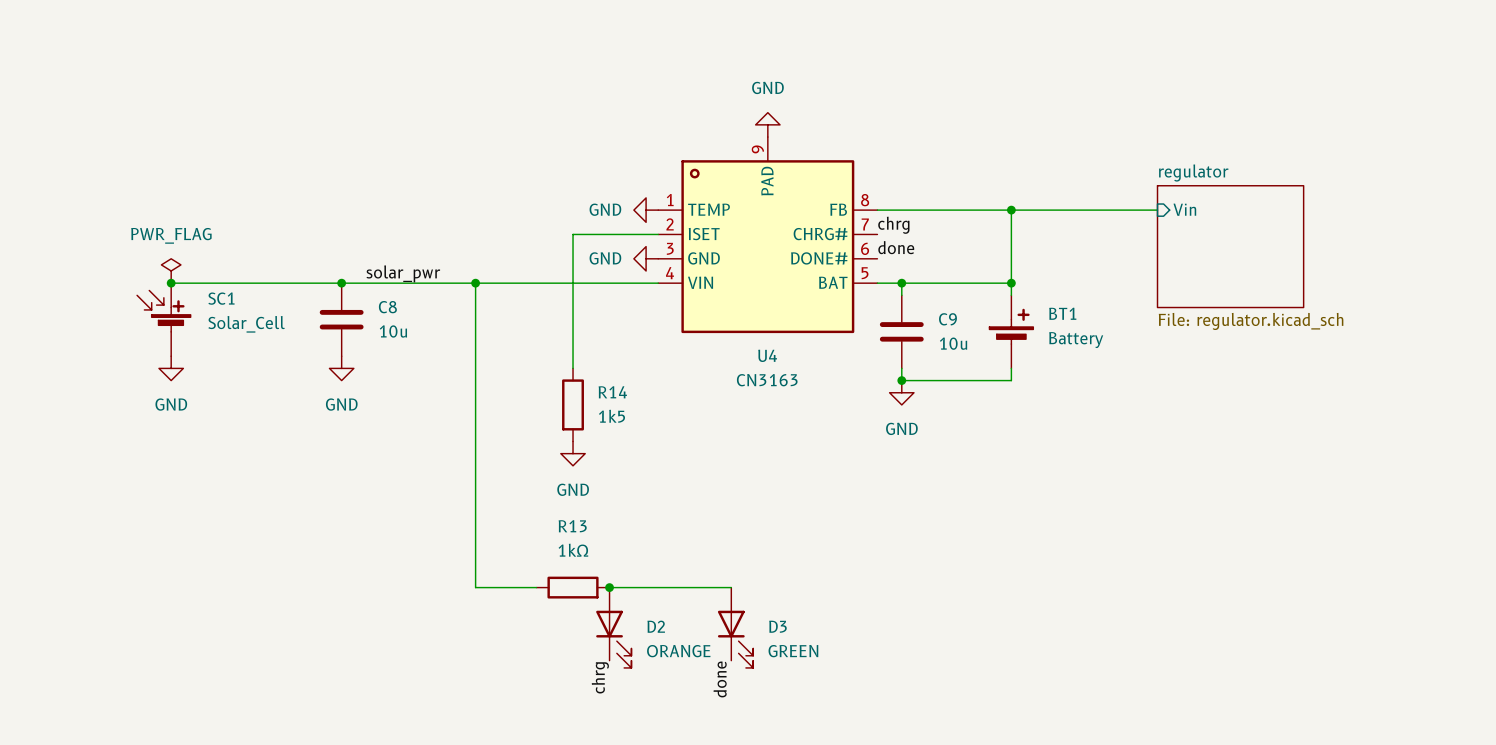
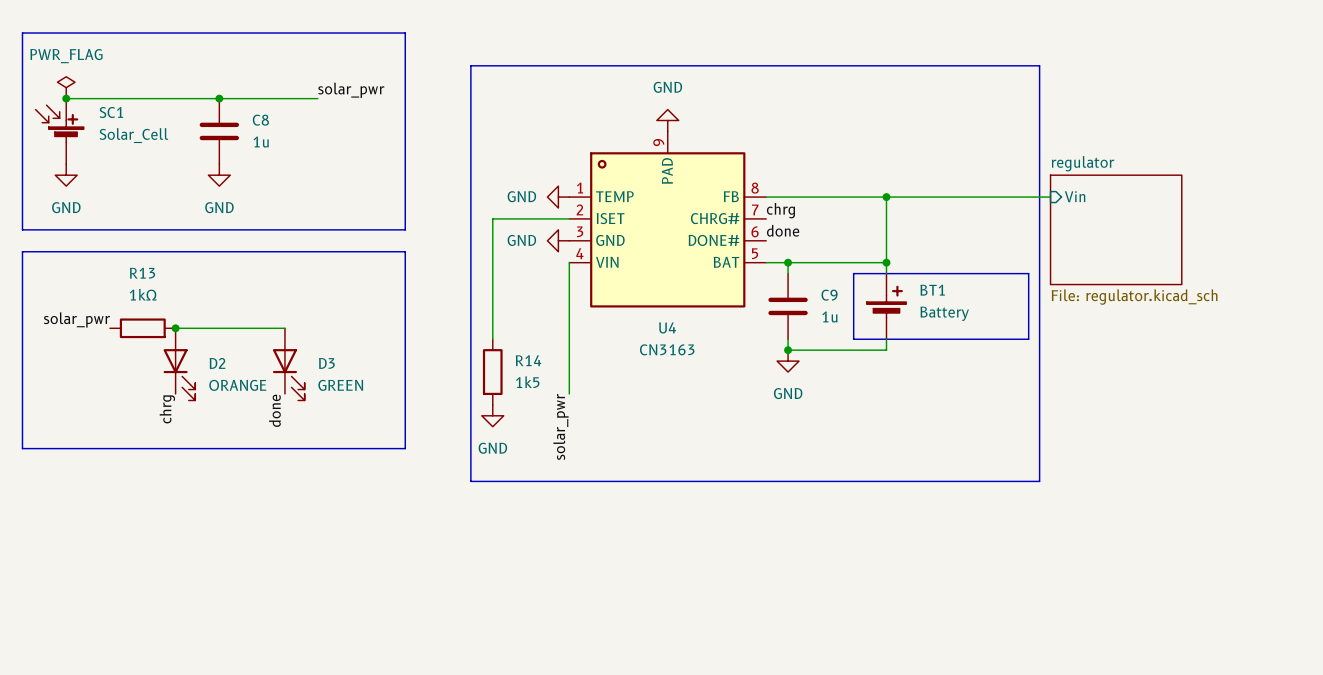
line: none -> (22, 33) (405, 33) (405, 229) (22, 229) (22, 33)
line: none -> (470, 65) (1039, 65) (1039, 481) (470, 481) (470, 65)
label: none -> solar_pwr (351, 90)
wire: none -> (66, 98) (317, 98)
junction: none -> (66, 98)
junction: none -> (219, 98)
power symbol: none -> GND (66, 175)
power symbol: none -> GND (219, 175)
sheet pin position: Vin (1184, 209) -> Vin (1075, 196)
wire: none -> (1017, 197) (1050, 197)
sheet regulator position: (1230, 246) -> (1116, 229)
line: none -> (22, 251) (22, 448) (405, 448) (405, 251) (22, 251)
power symbol position: PWR_FLAG (171, 270) -> PWR_FLAG (66, 87)
label: solar_pwr (403, 273) -> none
wire: (171, 283) (658, 283) -> (569, 393) (569, 262)
junction: (171, 283) -> none
junction: (341, 283) -> none
wire: (475, 283) (475, 587) (536, 587) -> none
junction: (475, 283) -> none
line: none -> (853, 273) (1028, 273) (1028, 339) (853, 339) (853, 273)
SC1 position: (163, 319) -> (59, 131)
C8 position: (341, 319) -> (219, 131)
C8 value: 10u (393, 331) -> 1u (261, 142)
C9 value: 10u (953, 343) -> 1u (829, 317)
label: none -> solar_pwr (76, 319)
wire: none -> (175, 328) (284, 328)
junction: none -> (175, 328)
power symbol: GND (171, 368) -> none
power symbol: GND (341, 368) -> none
label: none -> chrg (167, 409)
label: none -> done (274, 410)
label: none -> solar_pwr (561, 426)
R13 position: (573, 587) -> (142, 328)
wire: (609, 587) (731, 587) -> none
junction: (609, 587) -> none
D2 position: (613, 627) -> (179, 364)
D3 position: (735, 627) -> (288, 364)
label: chrg (600, 677) -> none
label: done (720, 679) -> none

